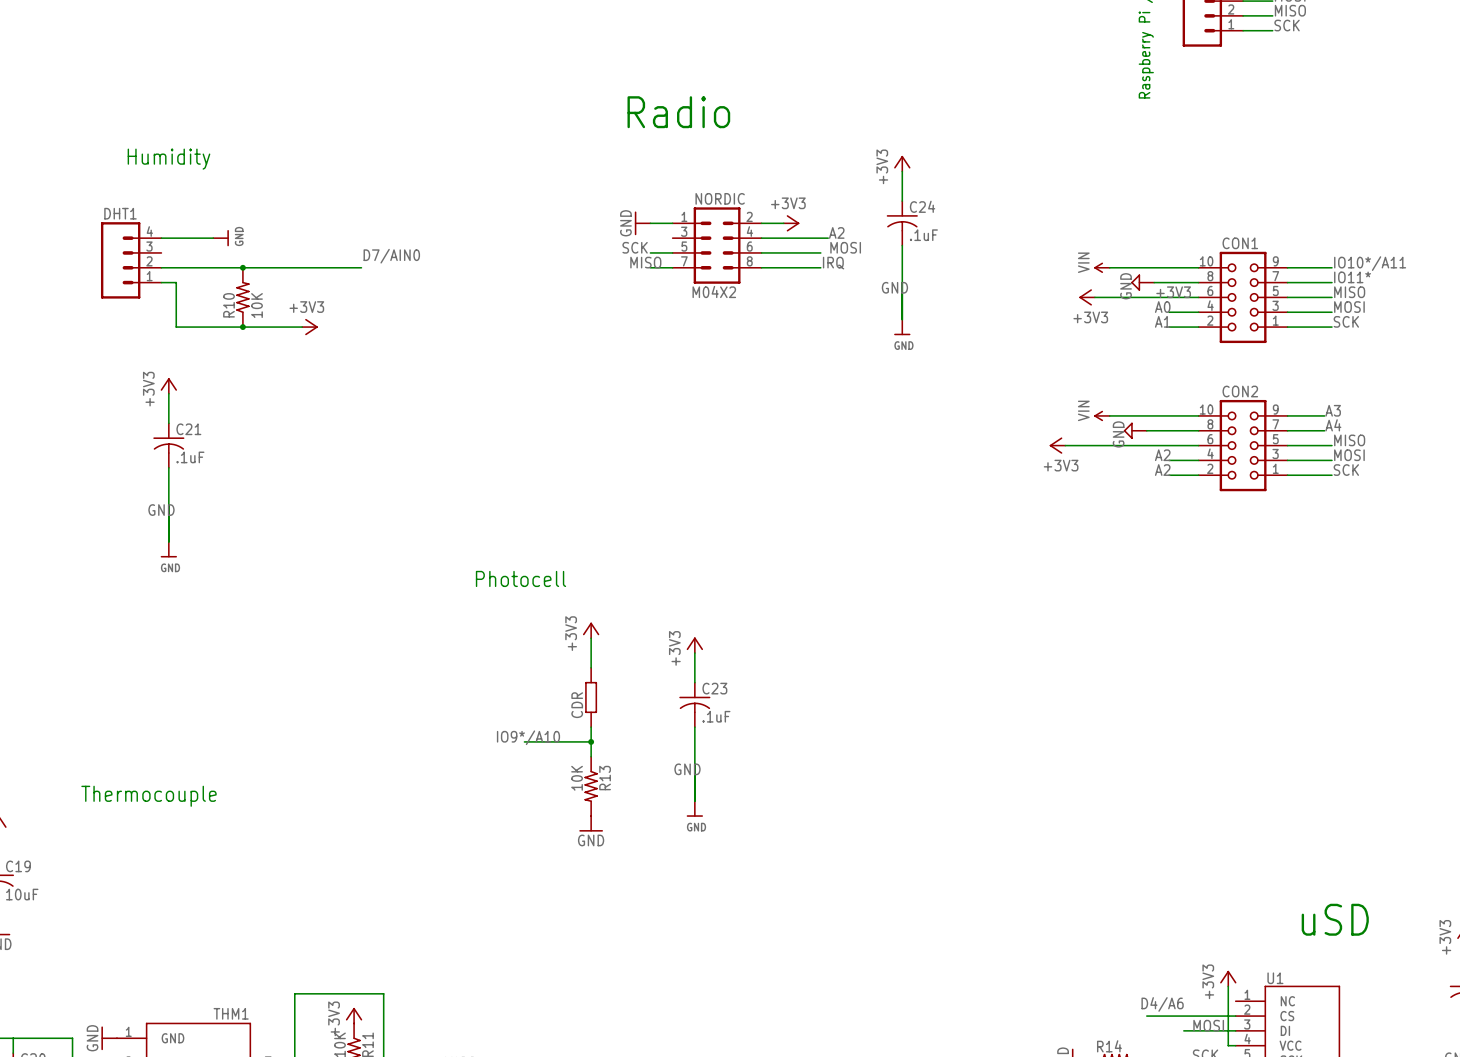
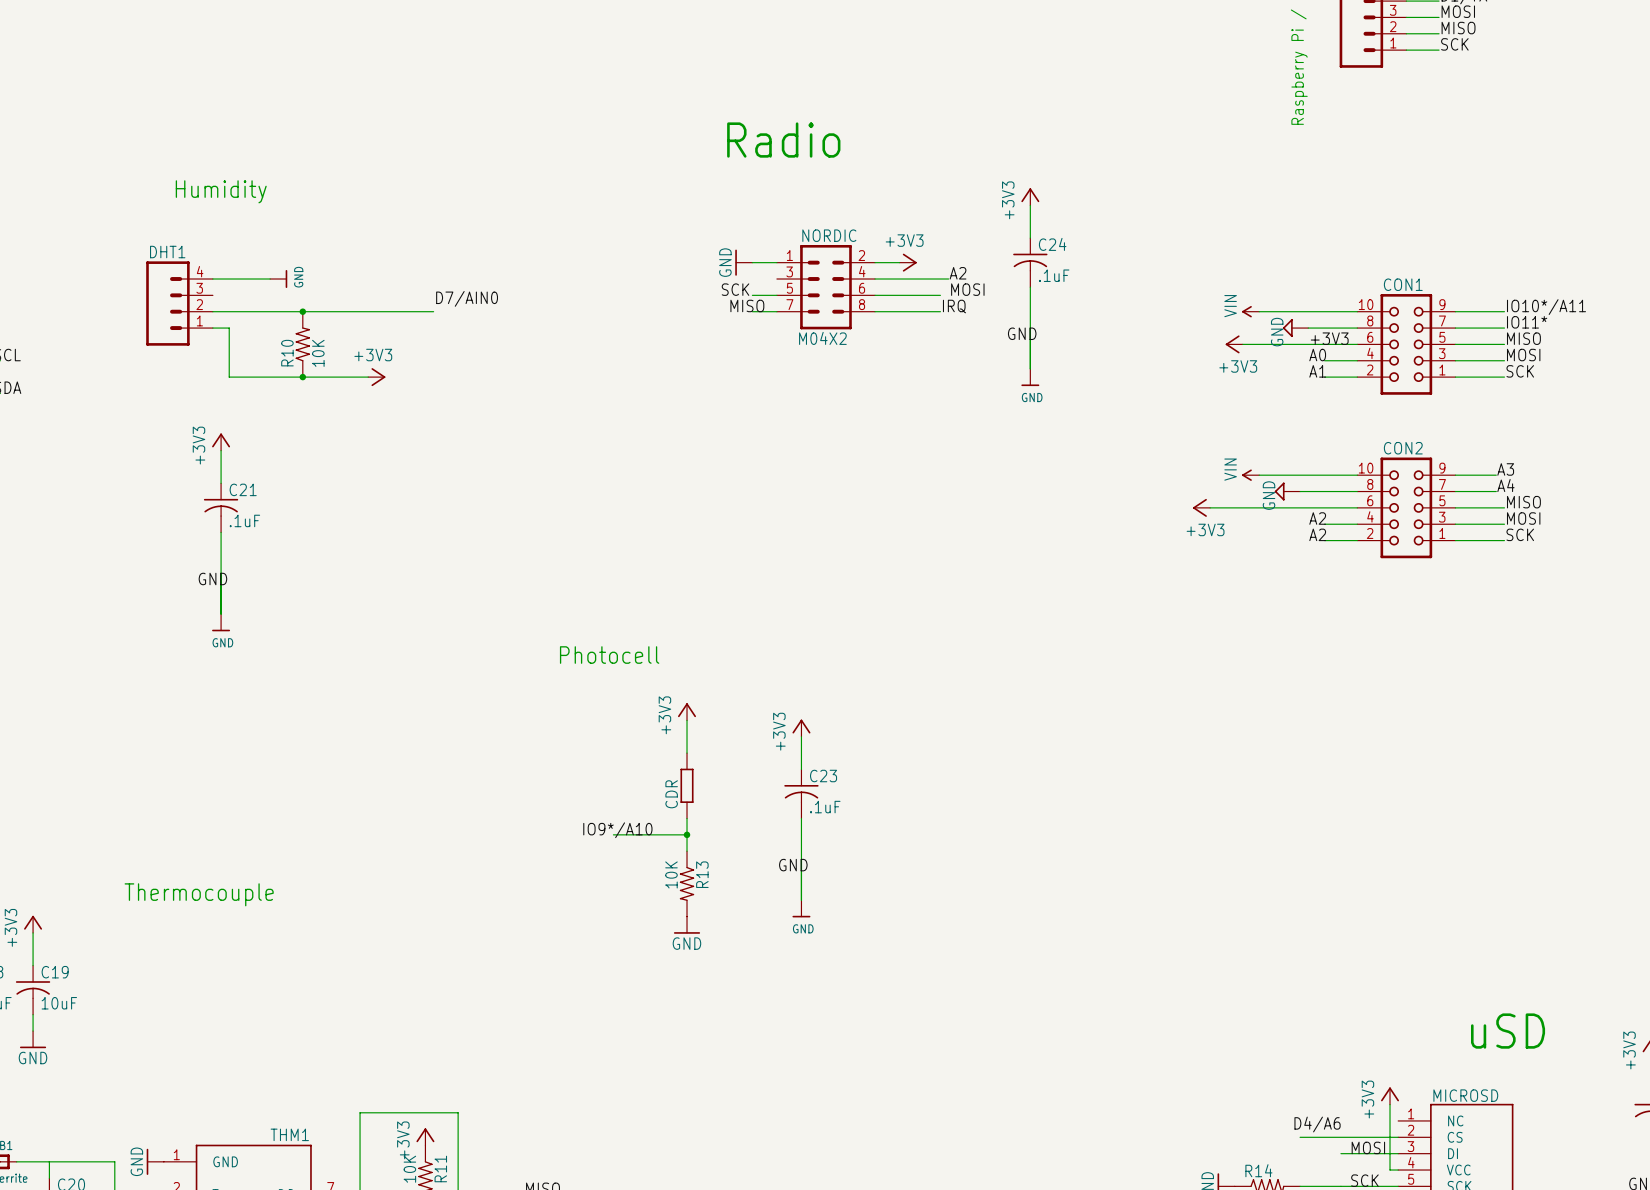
U1 name: U1 (1275, 978) -> MICROSD (1465, 1095)

